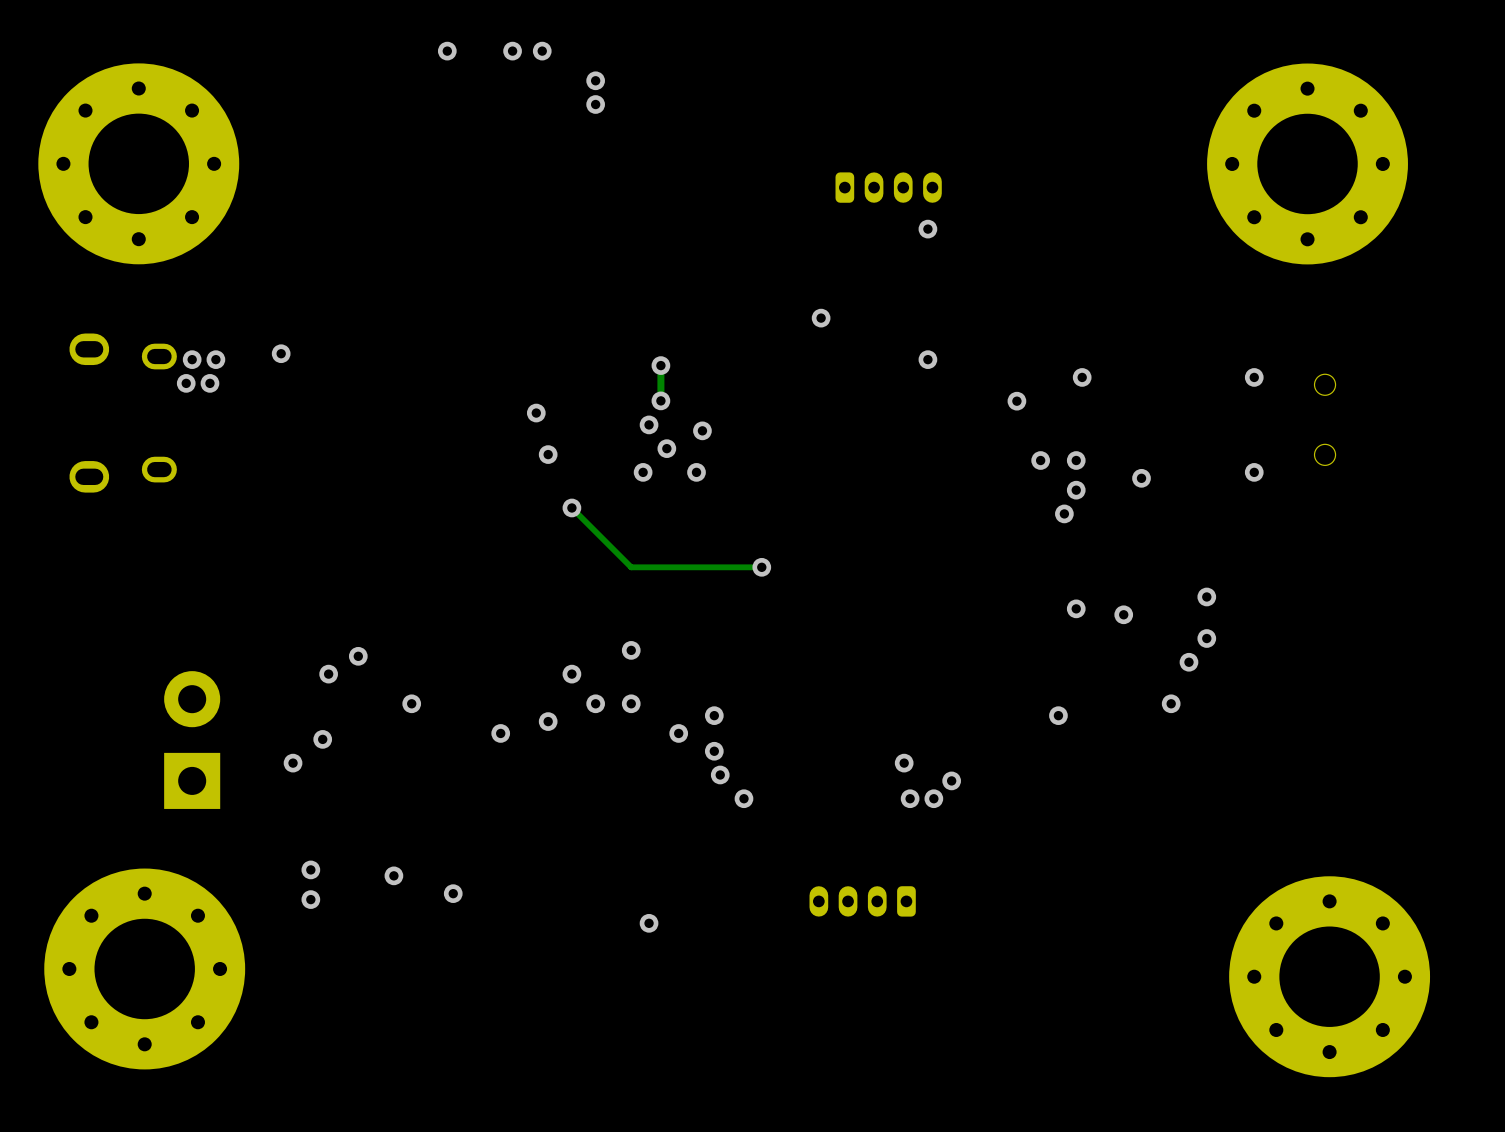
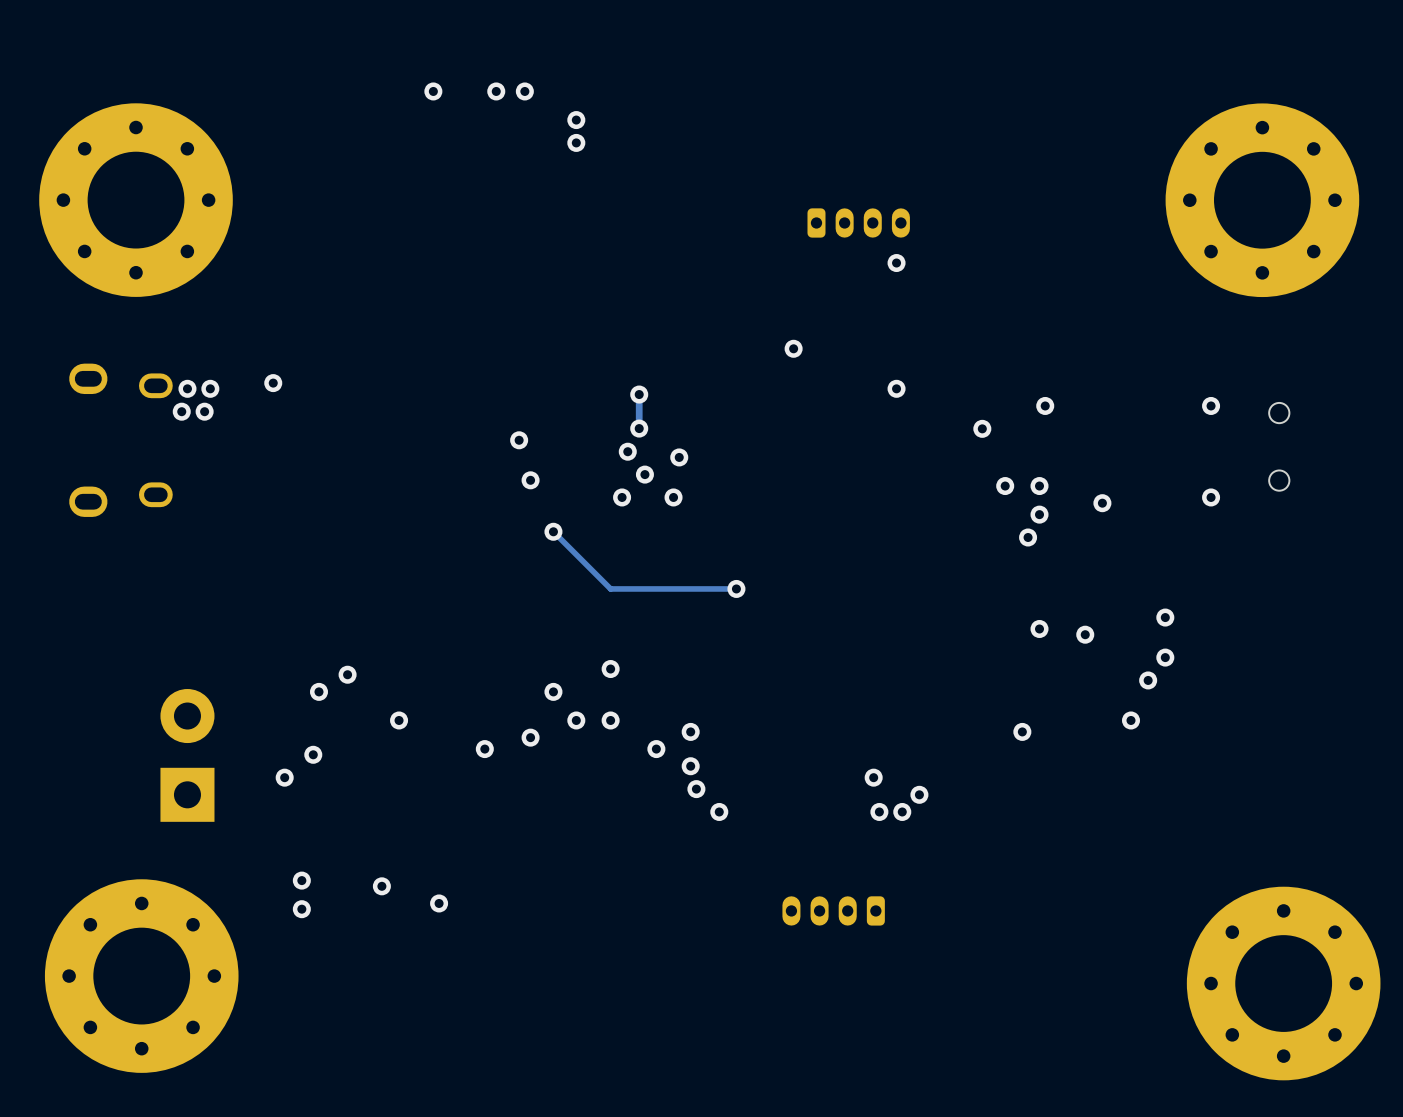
via: (649, 923) -> none

